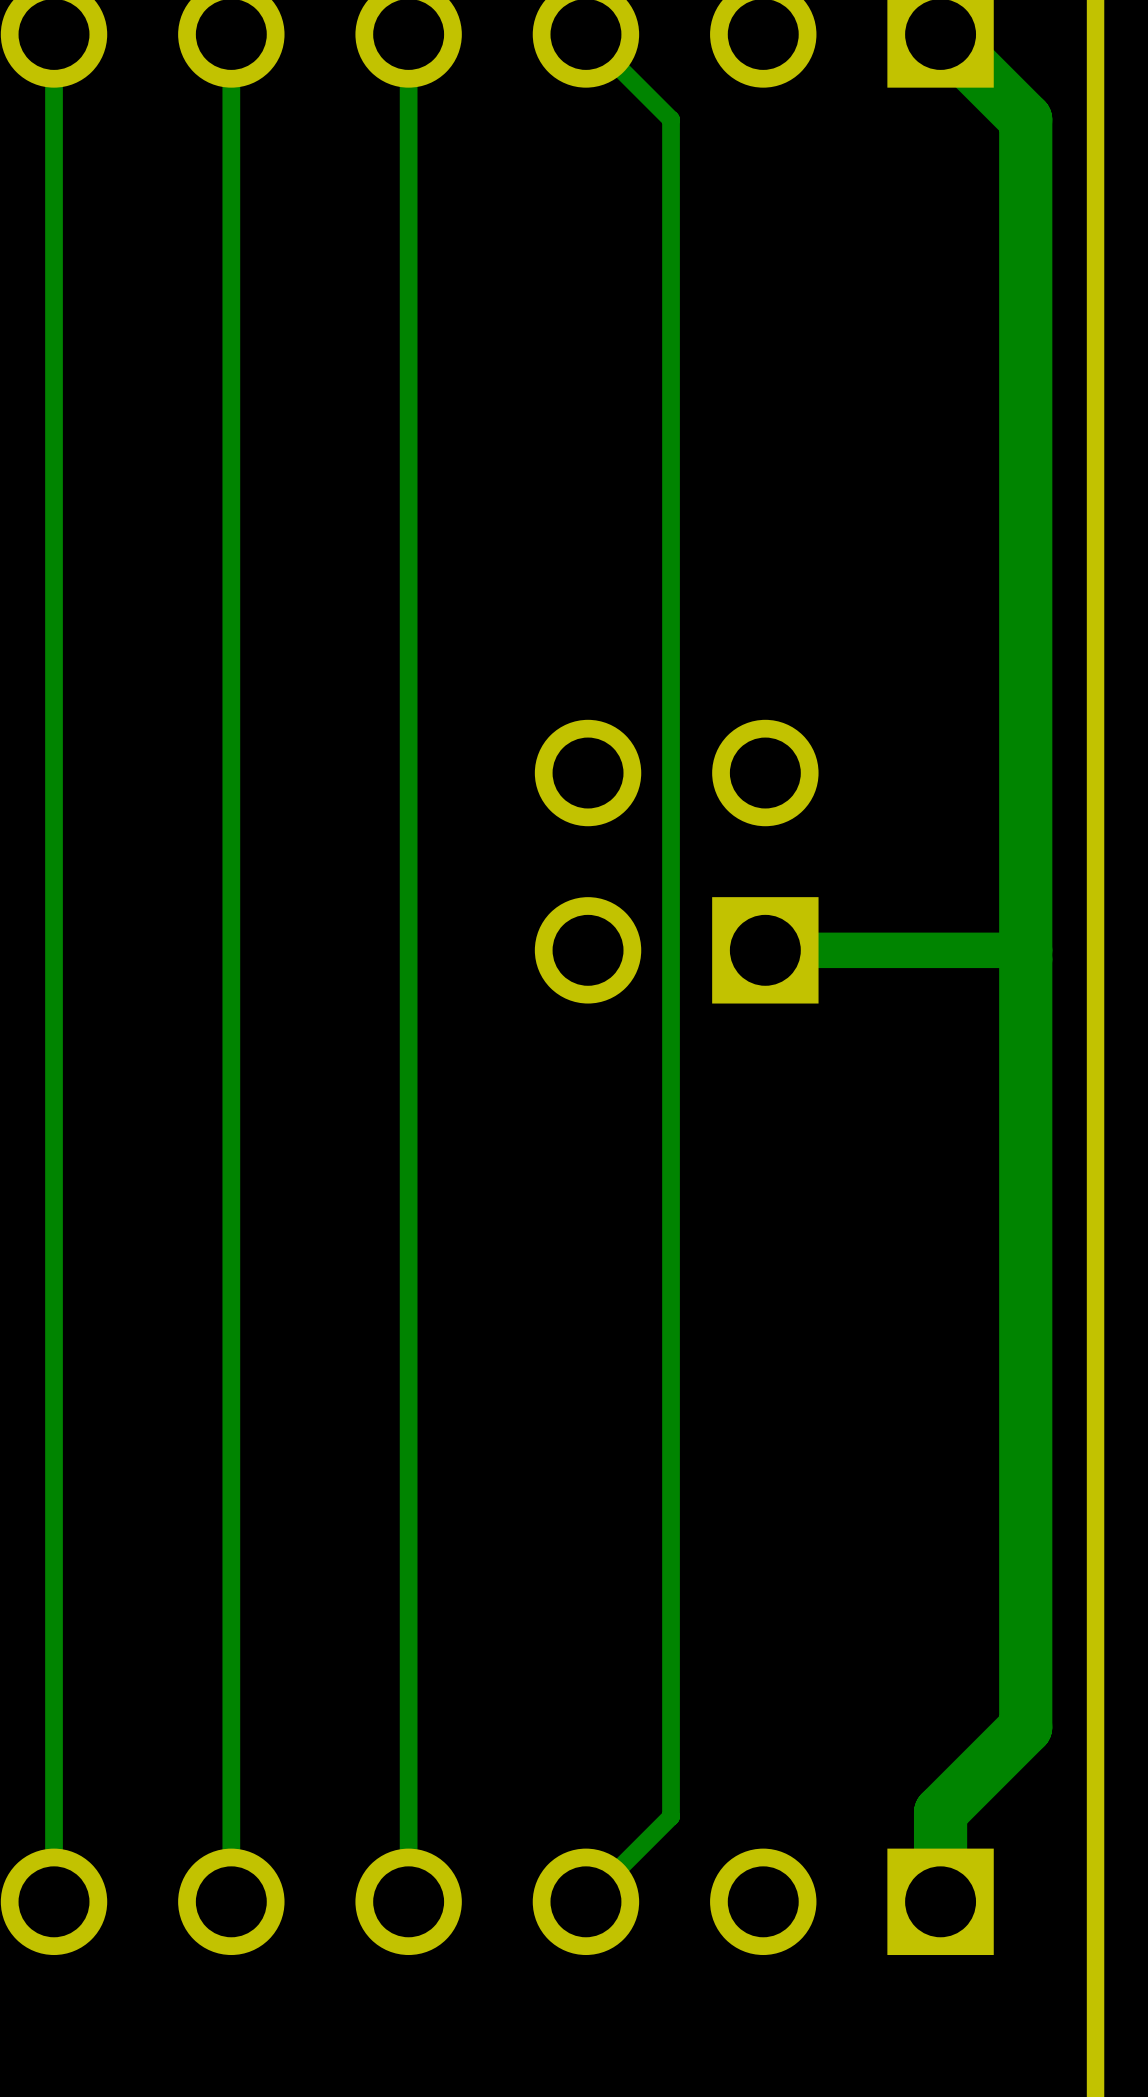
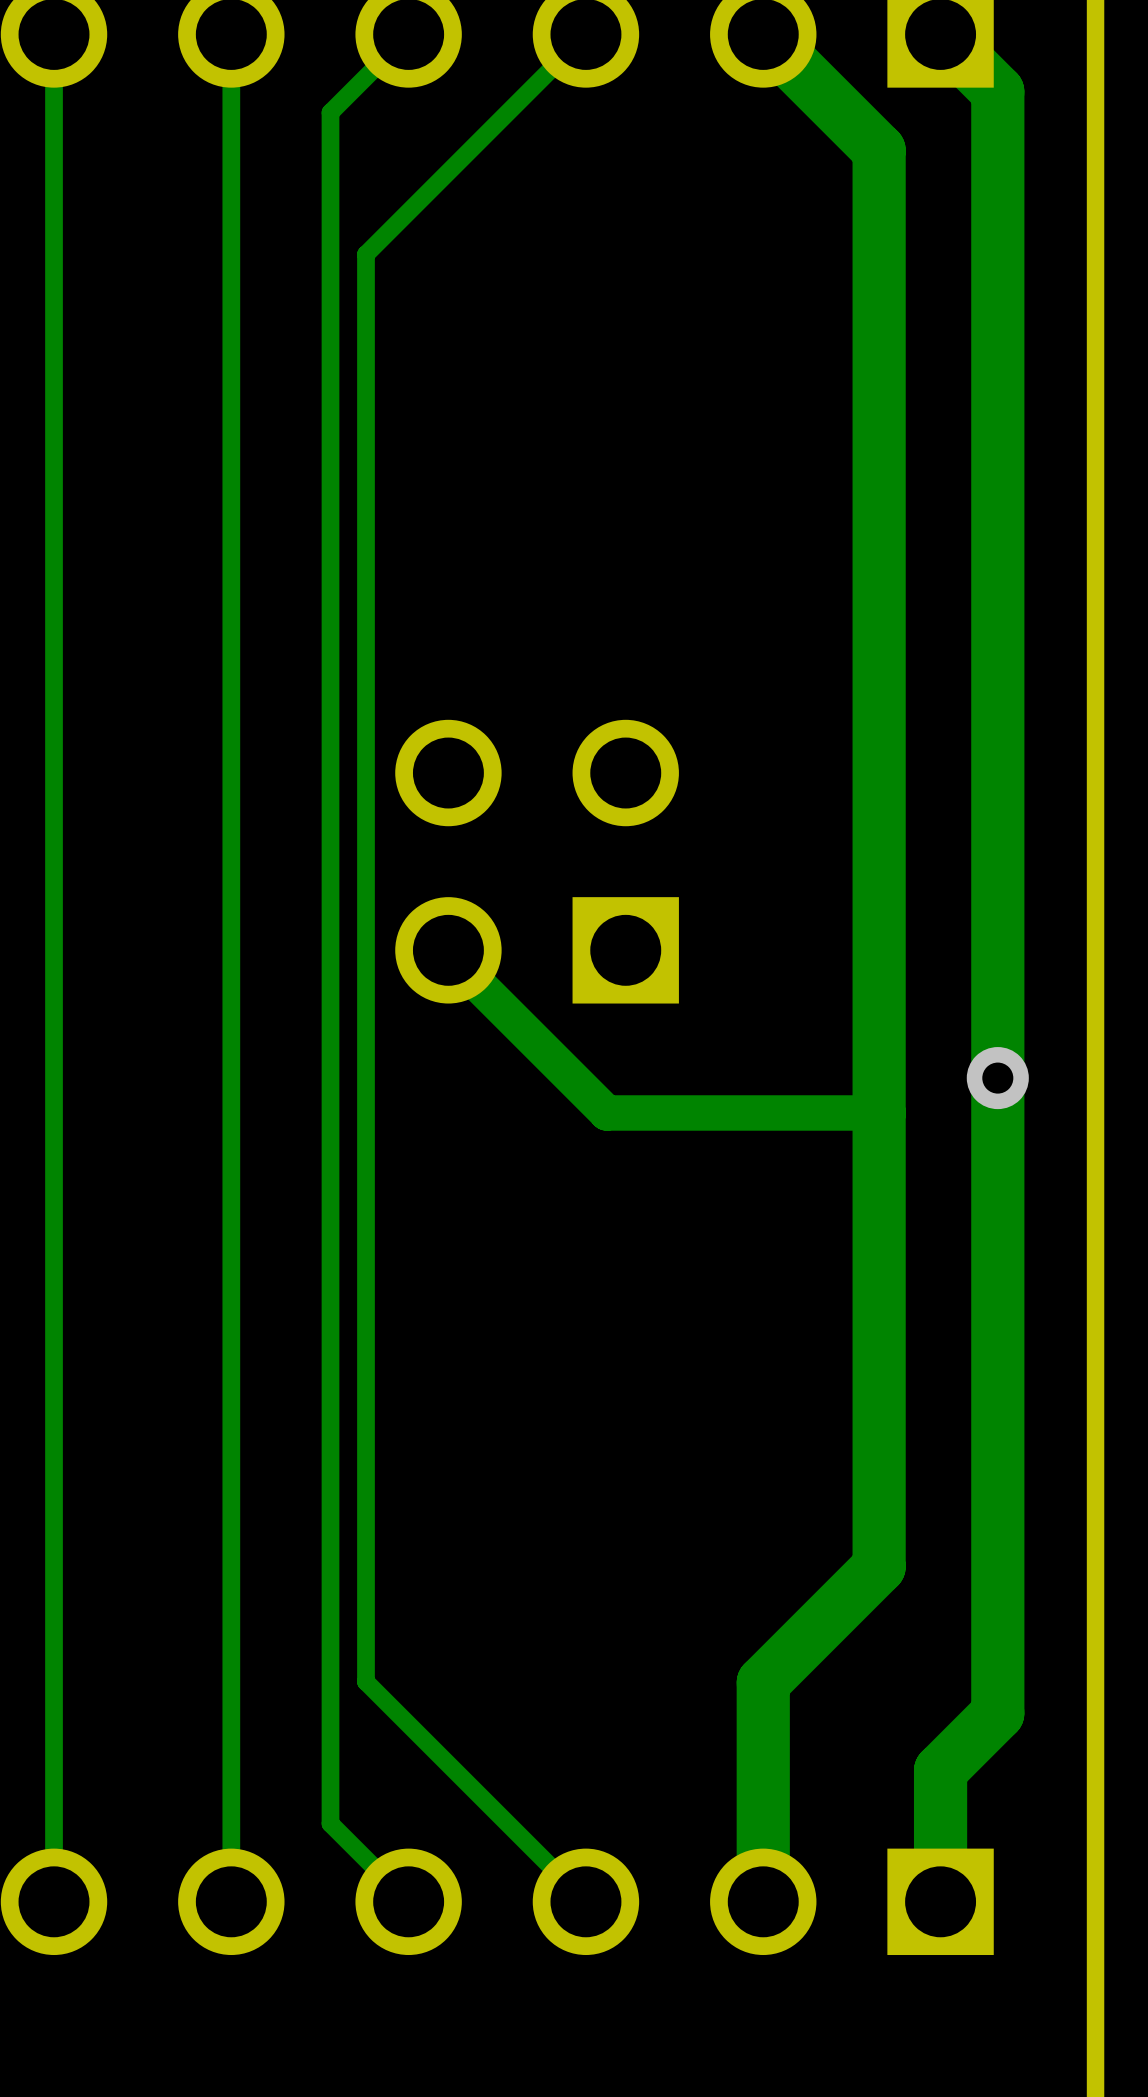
track: (408, 34) (408, 1901) -> (408, 34) (330, 112) (330, 1823) (408, 1901)
track: (585, 34) (671, 119) (671, 1816) (585, 1901) -> (585, 34) (365, 254) (365, 1681) (585, 1901)
track: none -> (763, 34) (879, 150) (879, 1566) (763, 1682) (763, 1901)
track: (997, 91) (1025, 119) (1025, 1727) (940, 1812) -> (997, 91) (997, 1713) (940, 1770) (940, 1812)
part position: (676, 861) -> (537, 861)
track: none -> (448, 950) (448, 954) (606, 1112) (879, 1112)
track: (765, 950) (1025, 950) (1025, 959) -> none
via: none -> (997, 1078)

